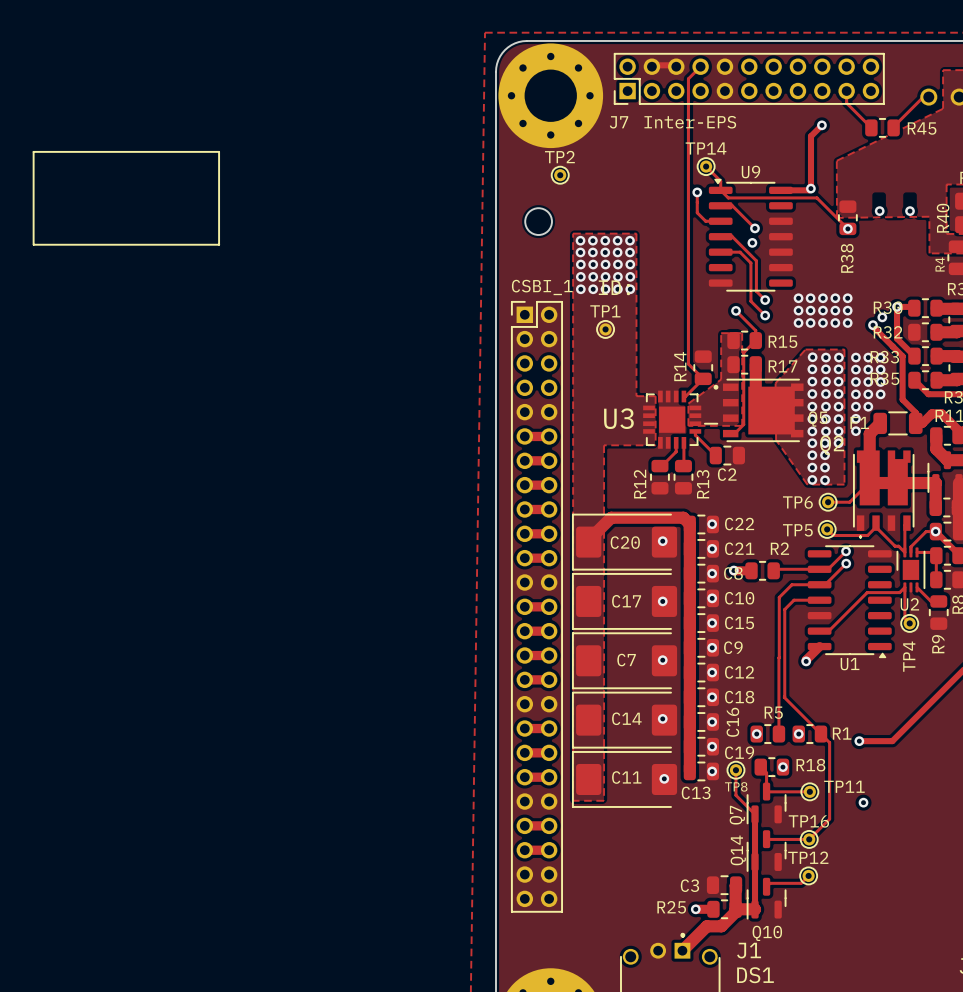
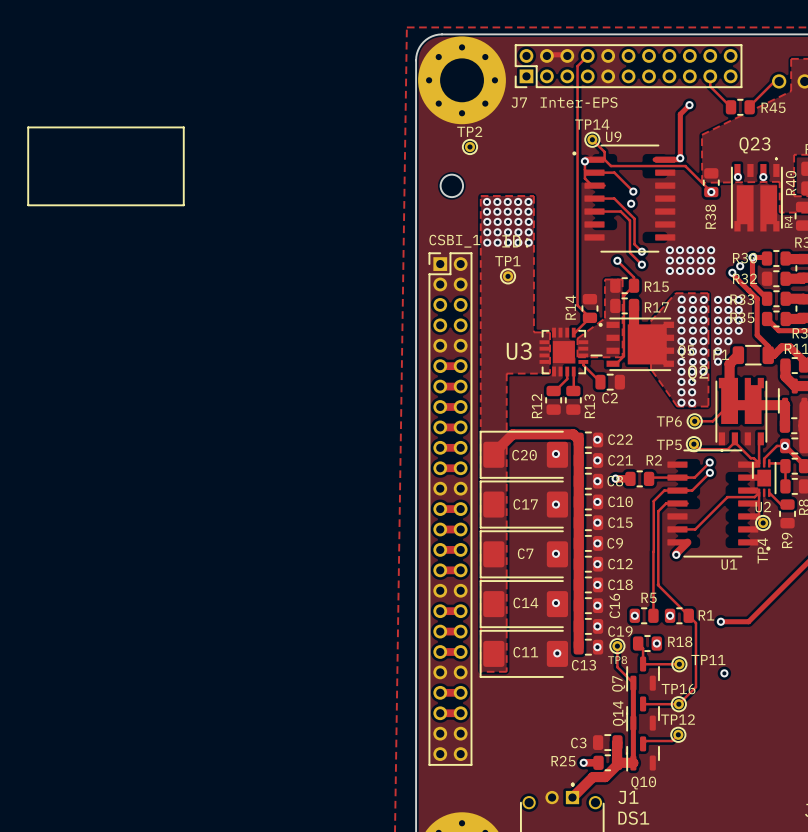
U9 footprint: [708, 178, 793, 292] -> [572, 144, 676, 253]
Q23: none -> (756, 194)
U1 footprint: [807, 545, 892, 659] -> [667, 449, 771, 558]

